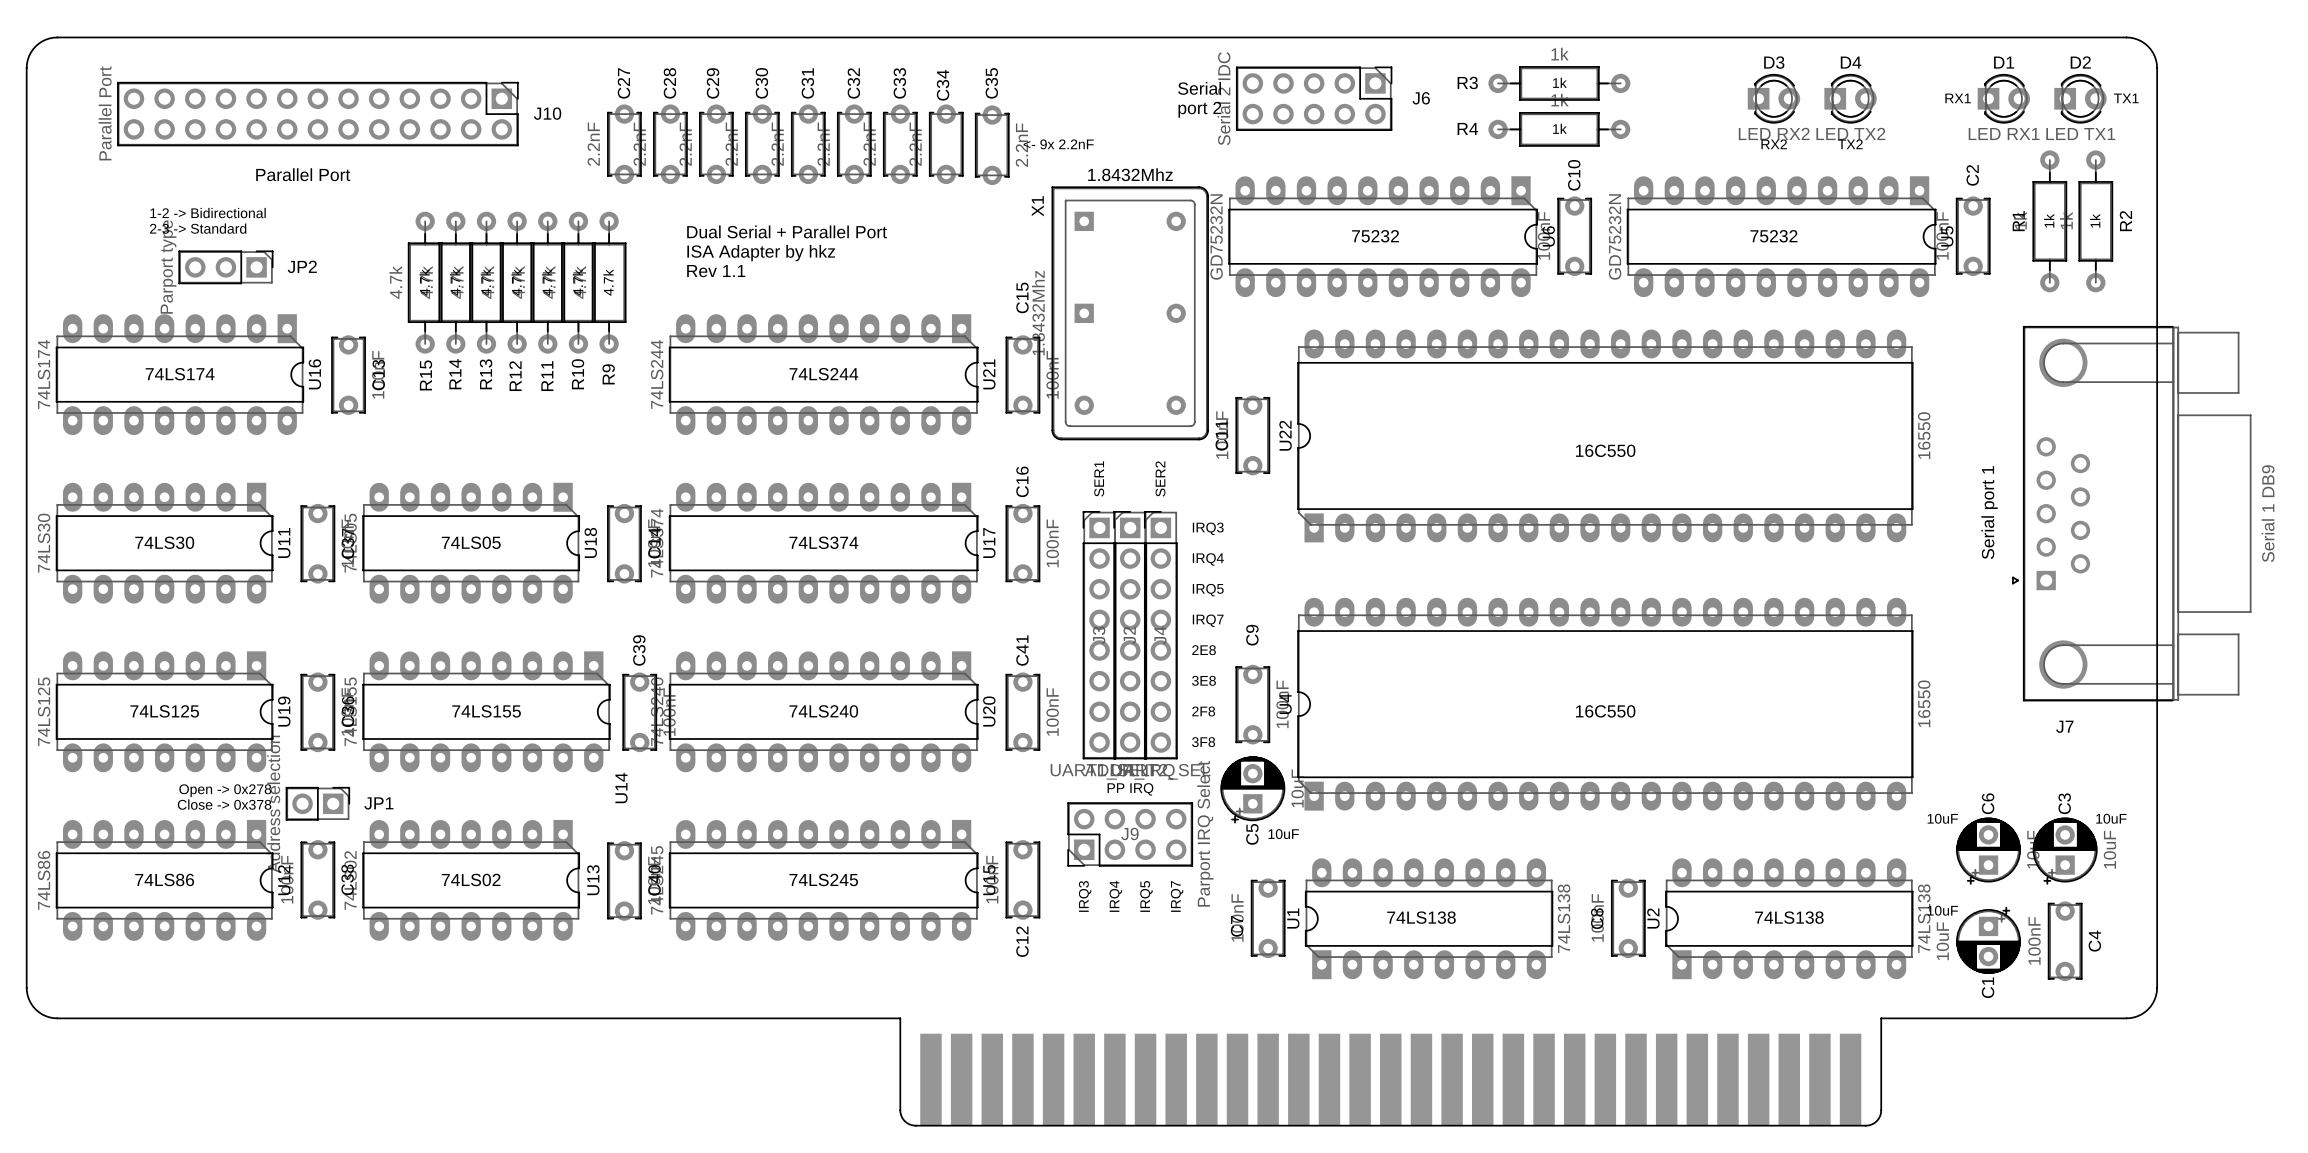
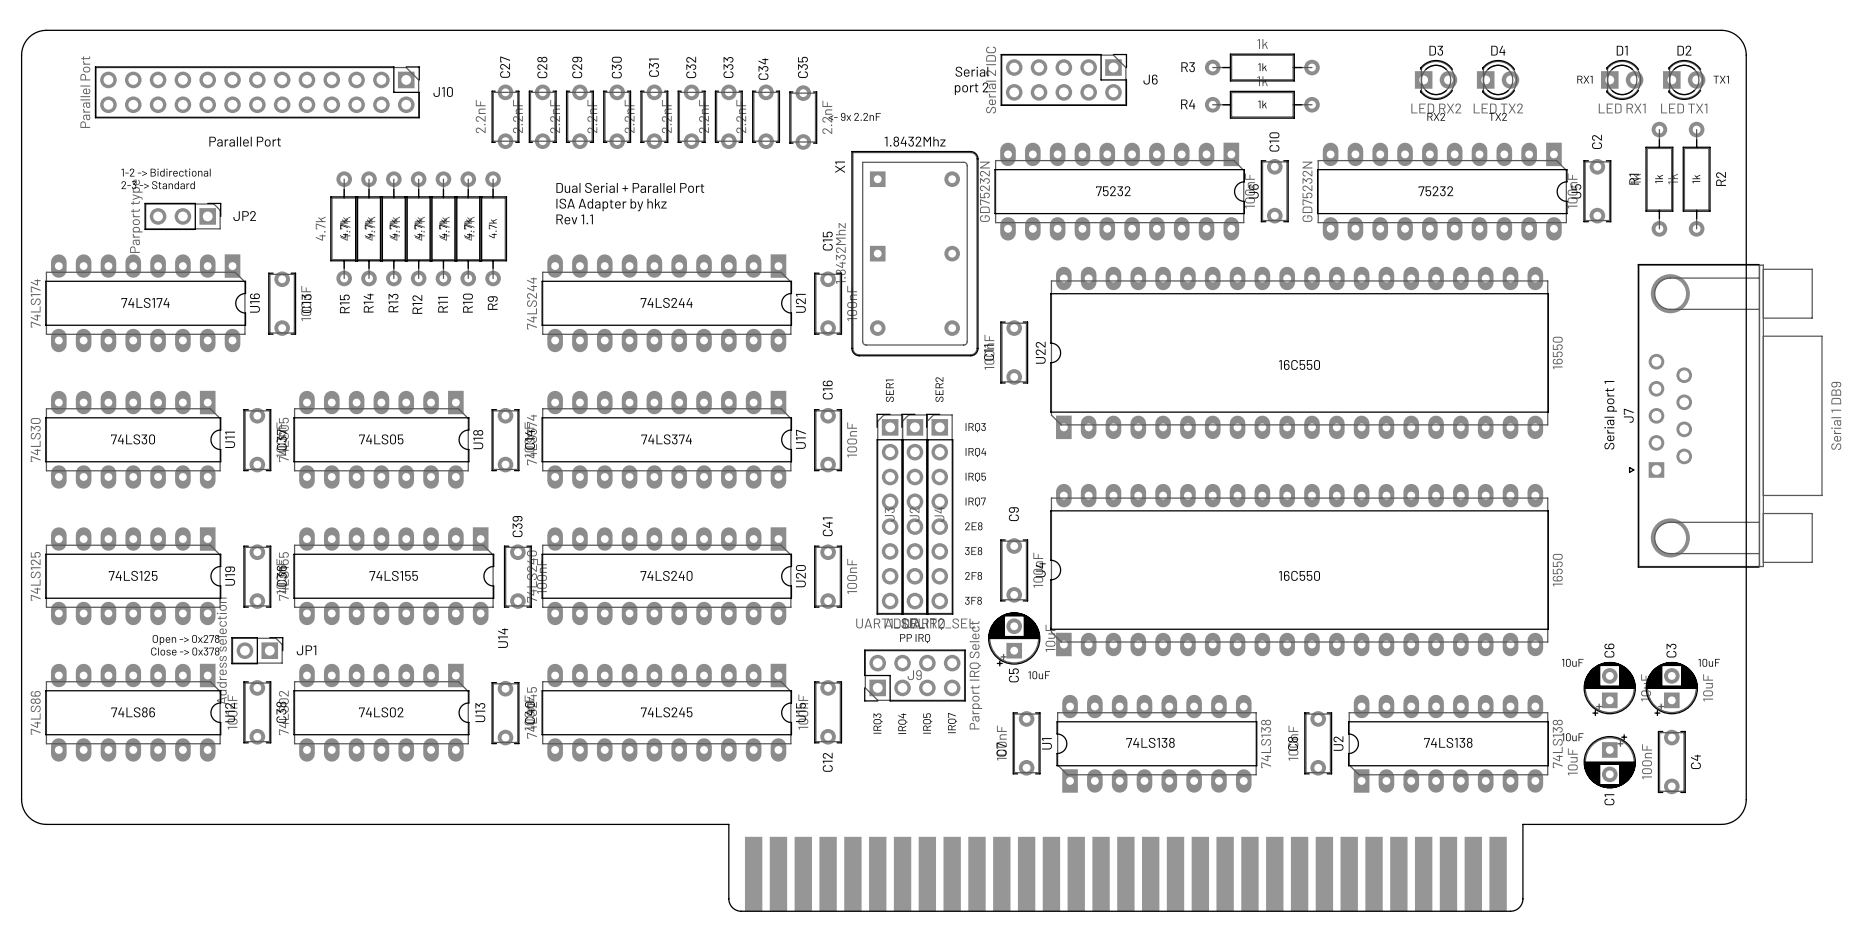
J7 name rotation: 0° (2064, 726) -> 90° counterclockwise (1628, 415)
J7 name position: J7 (2064, 726) -> J7 (1628, 415)

